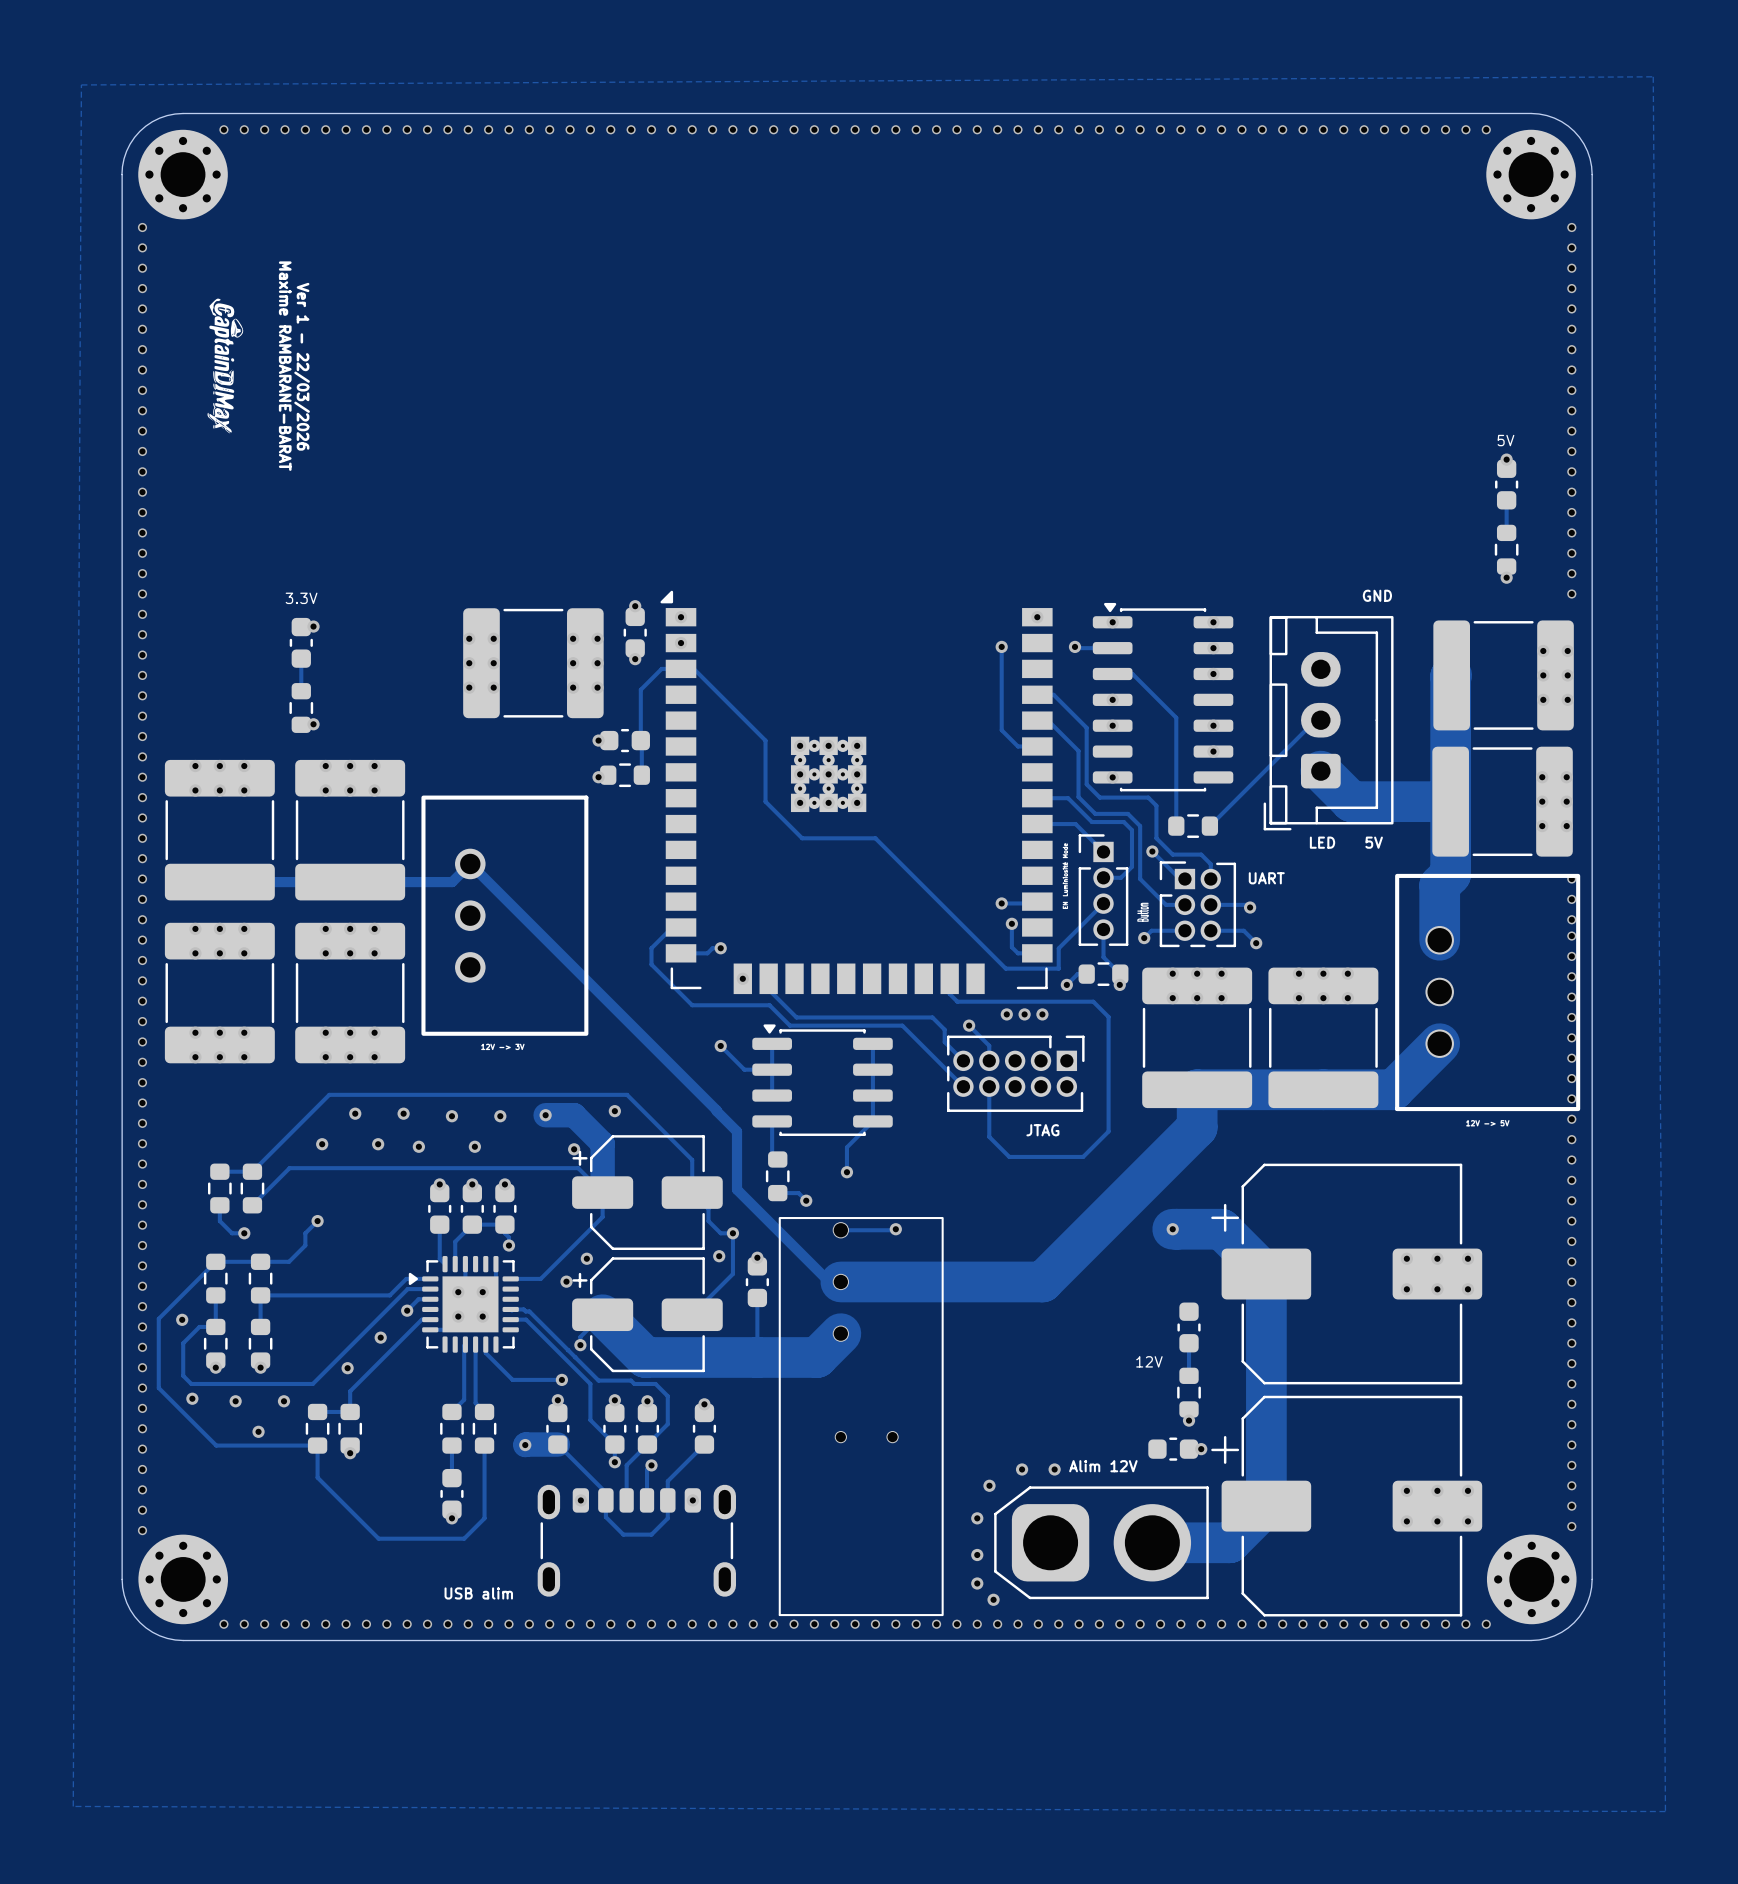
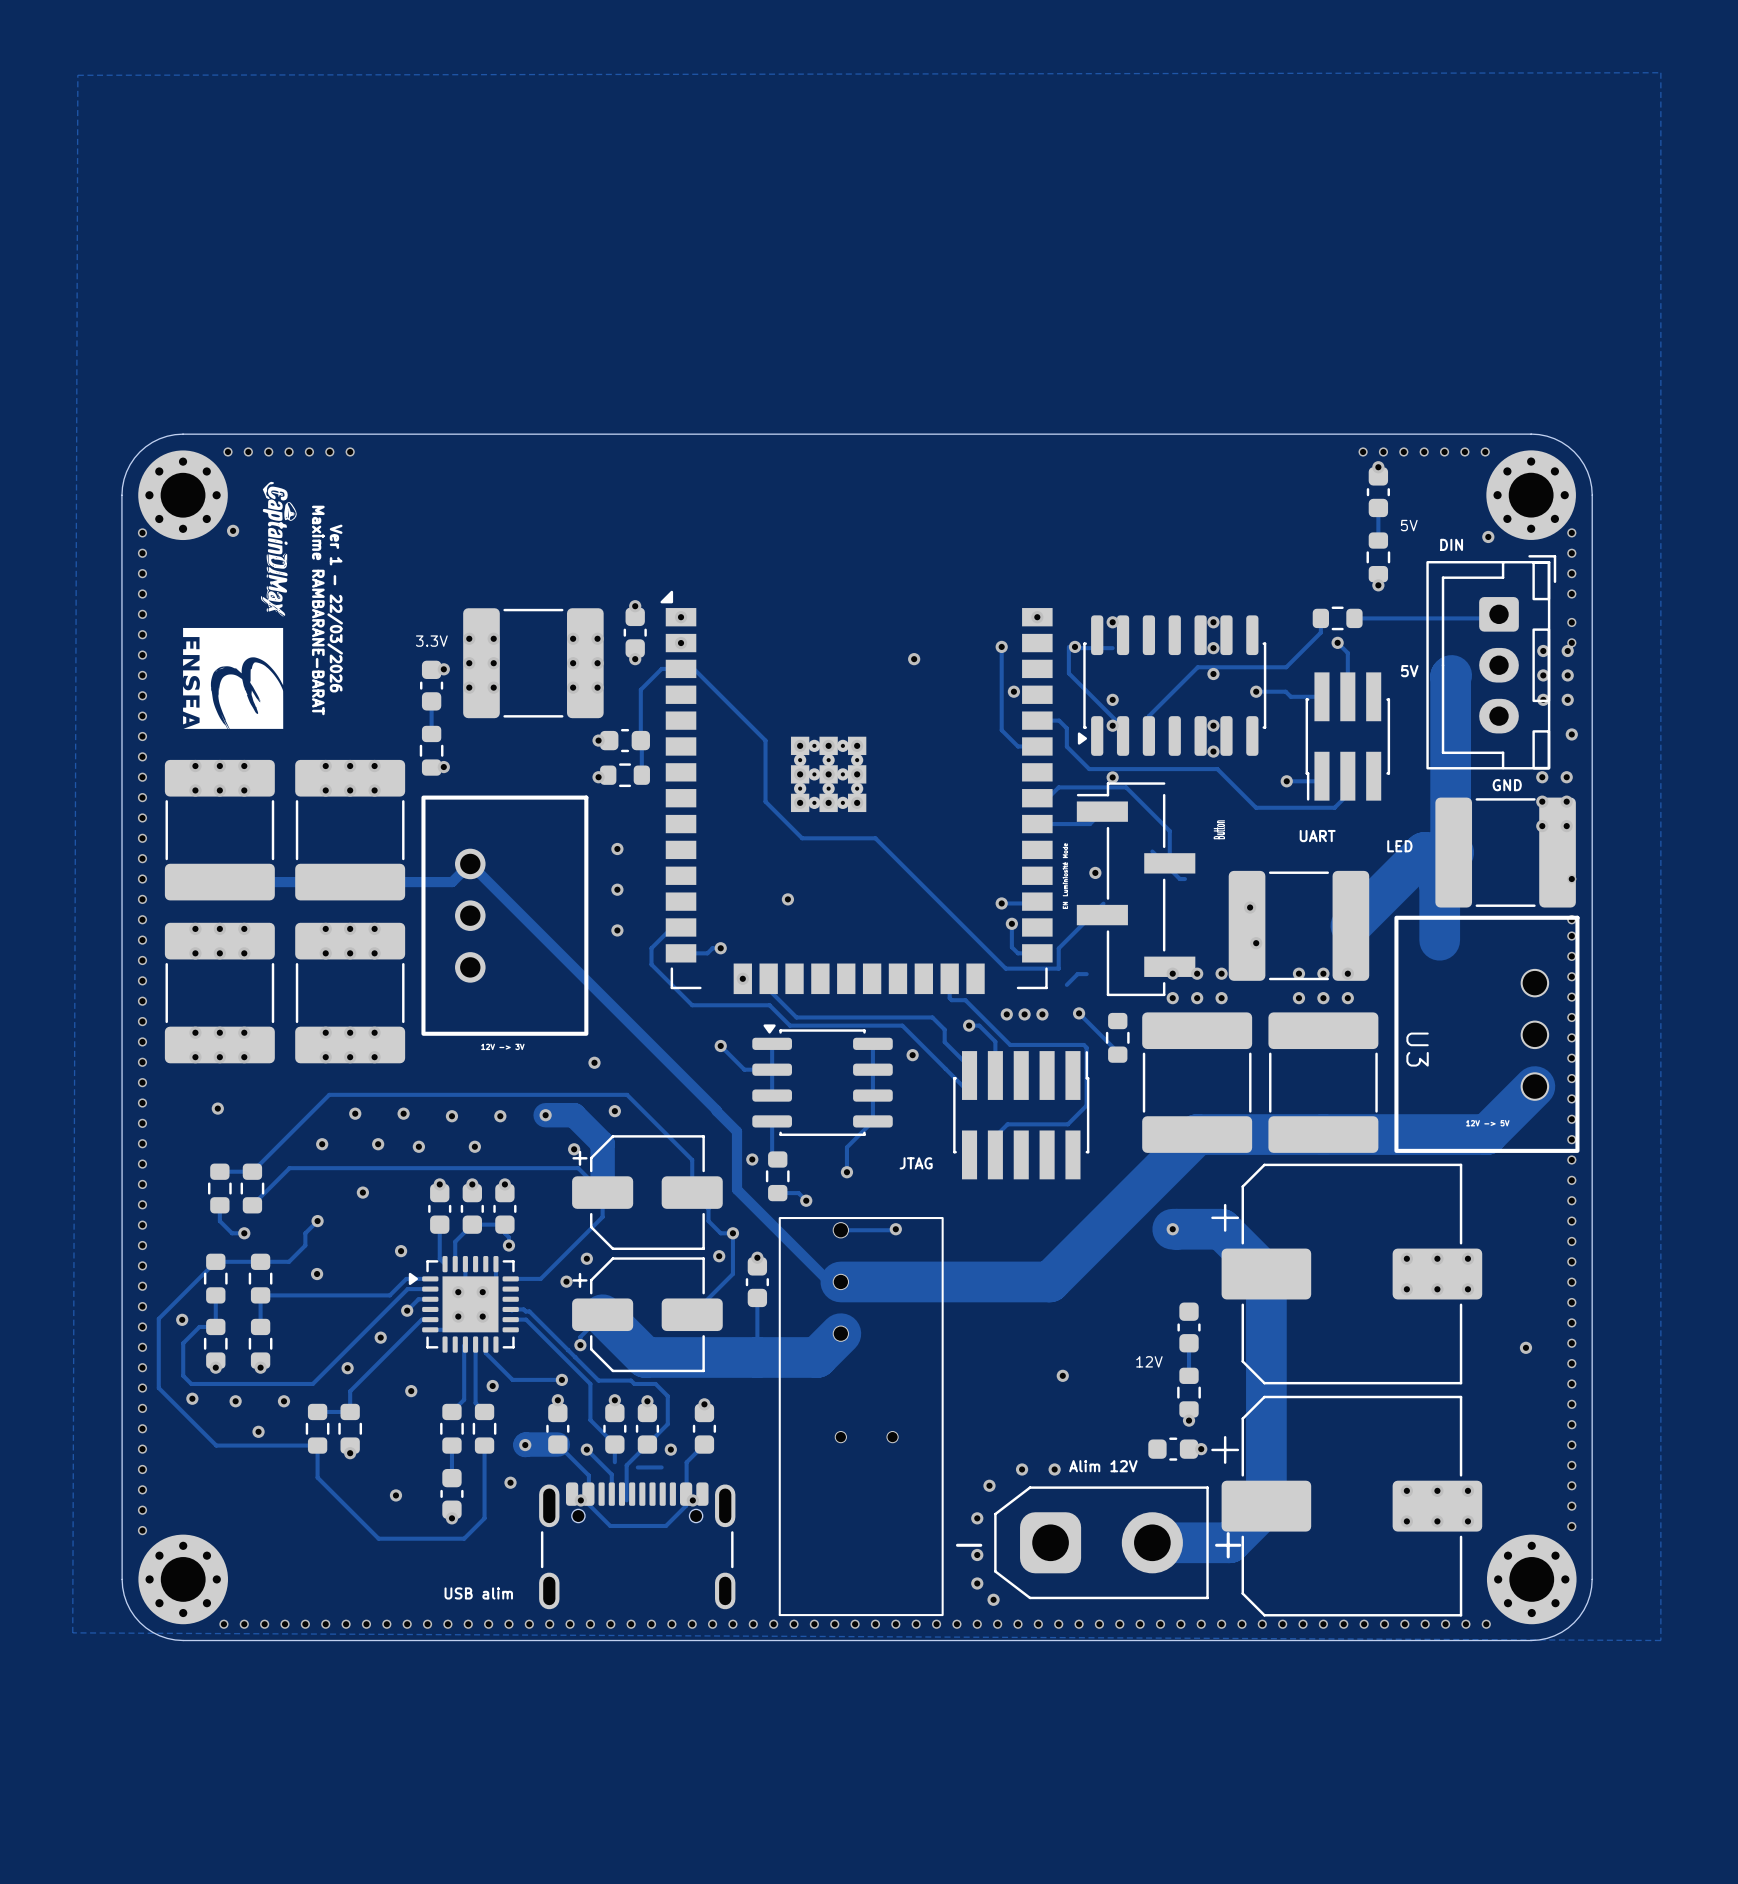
zone outline: (1653, 76) (81, 84) (73, 1806) (1665, 1811) (1653, 76) -> (1660, 72) (77, 75) (72, 1632) (1660, 1640) (1660, 72)
via: (223, 129) -> none
via: (244, 129) -> none
via: (264, 129) -> none
via: (285, 129) -> none
via: (305, 129) -> none
via: (325, 129) -> none
via: (346, 129) -> none
via: (366, 129) -> none
via: (386, 129) -> none
via: (407, 129) -> none
via: (427, 129) -> none
via: (447, 129) -> none
via: (468, 129) -> none
via: (488, 129) -> none
via: (508, 129) -> none
via: (529, 129) -> none
via: (549, 129) -> none
via: (570, 129) -> none
via: (590, 129) -> none
via: (610, 129) -> none
via: (631, 129) -> none
via: (651, 129) -> none
via: (671, 129) -> none
via: (692, 129) -> none
via: (712, 129) -> none
via: (732, 129) -> none
via: (753, 129) -> none
via: (773, 129) -> none
via: (794, 129) -> none
via: (814, 129) -> none
via: (834, 129) -> none
via: (855, 129) -> none
via: (875, 129) -> none
via: (895, 129) -> none
via: (916, 129) -> none
via: (936, 129) -> none
via: (956, 129) -> none
via: (977, 129) -> none
via: (997, 129) -> none
via: (1017, 129) -> none
via: (1038, 129) -> none
via: (1058, 129) -> none
via: (1079, 129) -> none
via: (1099, 129) -> none
via: (1119, 129) -> none
via: (1140, 129) -> none
via: (1160, 129) -> none
via: (1180, 129) -> none
via: (1201, 129) -> none
via: (1221, 129) -> none
via: (1241, 129) -> none
via: (1262, 129) -> none
via: (1282, 129) -> none
via: (1303, 129) -> none
via: (1323, 129) -> none
via: (1343, 129) -> none
via: (1364, 129) -> none
via: (1384, 129) -> none
via: (1404, 129) -> none
via: (1425, 129) -> none
via: (1445, 129) -> none
via: (1465, 129) -> none
via: (1486, 129) -> none
board edge: (121, 174) (126, 151) (139, 131) (159, 118) (183, 113) (1531, 113) (1554, 118) (1574, 131) (1587, 151) (1592, 174) (1592, 1579) -> (122, 1579) (121, 495) (126, 471) (139, 452) (159, 438) (183, 434) (1531, 434) (1546, 436) (1568, 446) (1579, 457) (1587, 471) (1592, 495) (1592, 1579)
board edge: (122, 174) (122, 1579) -> none
part position: (183, 174) -> (183, 495)
part position: (1531, 174) -> (1531, 495)
via: (142, 227) -> none
via: (1571, 227) -> none
via: (142, 247) -> none
via: (1571, 247) -> none
via: (142, 268) -> none
via: (1571, 268) -> none
via: (142, 288) -> none
via: (1571, 288) -> none
via: (142, 308) -> none
via: (1571, 308) -> none
via: (142, 329) -> none
via: (1571, 329) -> none
via: (142, 349) -> none
via: (1571, 349) -> none
drawing position: (225, 366) -> (278, 549)
text position: Maxime RAMBARANE-BARAT (285, 366) -> Maxime RAMBARANE-BARAT (318, 610)
text position: Ver 1 - 22/03/2026 (302, 366) -> Ver 1 - 22/03/2026 (335, 608)
via: (142, 370) -> none
via: (1571, 370) -> none
via: (142, 390) -> none
via: (1571, 390) -> none
via: (142, 410) -> none
via: (1571, 410) -> none
via: (142, 431) -> none
via: (1571, 431) -> none
text: 5V (1505, 440) -> none
via: (142, 451) -> none
via: none -> (228, 451)
via: none -> (248, 451)
via: none -> (268, 451)
via: none -> (289, 451)
via: none -> (309, 451)
via: none -> (329, 451)
via: none -> (350, 451)
via: none -> (1363, 451)
via: none -> (1383, 451)
via: none -> (1403, 451)
via: none -> (1424, 451)
via: none -> (1444, 451)
via: none -> (1464, 451)
via: none -> (1485, 451)
via: (1571, 451) -> none
via: (1506, 459) -> none
via: none -> (1378, 467)
via: (142, 471) -> none
via: (1571, 471) -> none
part position: (1506, 484) -> (1378, 492)
via: (142, 492) -> none
via: (1571, 492) -> none
track: (1506, 500) (1506, 532) -> (1378, 507) (1378, 540)
via: (142, 512) -> none
via: (1571, 512) -> none
text: none -> 5V (1409, 525)
via: none -> (233, 530)
via: none -> (1488, 536)
text: none -> DIN (1451, 544)
part: (1506, 549) -> none
part: none -> (1378, 557)
via: (1506, 577) -> none
via: none -> (1378, 585)
text position: GND (1377, 595) -> GND (1507, 785)
text position: 3.3V (301, 598) -> 3.3V (431, 641)
track: none -> (1499, 614) (1494, 618) (1354, 618)
track: none -> (1320, 618) (1320, 632) (1286, 667) (1197, 667) (1148, 716) (1148, 736)
part: none -> (1337, 618)
part footprint: [1433, 620, 1574, 731] -> [1426, 555, 1557, 770]
via: none -> (1571, 622)
via: (313, 626) -> none
drawing: none -> [183, 627, 284, 729]
part position: (301, 642) -> (431, 685)
track: none -> (1337, 642) (1347, 653) (1347, 696)
via: none -> (1337, 642)
via: none -> (1571, 642)
track: none -> (1068, 646) (1068, 673) (1123, 727) (1123, 736)
track: (301, 658) (301, 691) -> (431, 701) (431, 733)
via: none -> (914, 659)
via: none -> (443, 669)
text: none -> 5V (1409, 671)
track: (1112, 674) (1132, 674) (1176, 717) (1176, 826) -> none
via: none -> (1013, 691)
track: none -> (1256, 691) (1285, 691) (1290, 696) (1321, 696)
via: none -> (1256, 691)
track: (1037, 694) (1053, 694) (1086, 727) (1086, 784) (1099, 797) (1148, 797) (1156, 805) (1156, 838) (1172, 854) (1201, 854) (1210, 864) (1210, 879) -> none
part rotation: 0° (1163, 697) -> 90° counterclockwise (1172, 685)
part position: (301, 708) -> (431, 750)
track: (1048, 720) (1078, 750) (1078, 797) (1095, 813) (1127, 813) (1140, 826) (1140, 879) (1166, 904) (1184, 904) -> (1048, 720) (1059, 720) (1066, 728) (1066, 746) (1089, 769) (1217, 769) (1256, 807) (1334, 807) (1347, 794) (1347, 776)
track: (1320, 720) (1315, 720) (1209, 826) -> none
part: (1328, 723) -> none
via: (313, 724) -> none
via: none -> (1571, 734)
part: none -> (1347, 736)
via: none -> (443, 767)
track: (1320, 771) (1351, 801) (1450, 801) -> none
track: none -> (1321, 776) (1316, 781) (1286, 781)
via: none -> (1286, 781)
track: (1047, 798) (1068, 798) (1091, 822) (1123, 822) (1131, 830) (1131, 866) (1121, 877) (1103, 877) -> (1047, 798) (1058, 787) (1126, 787) (1169, 831) (1169, 863)
part position: (1502, 801) -> (1505, 852)
track: (1075, 824) (1103, 851) -> (1075, 824) (1089, 824) (1102, 811)
part: (1193, 826) -> none
text position: LED (1322, 842) -> LED (1399, 846)
text: 5V (1374, 842) -> none
via: none -> (617, 849)
via: (1152, 851) -> none
track: none -> (1453, 852) (1424, 852) (1350, 925)
via: none -> (1095, 872)
text position: UART (1266, 878) -> UART (1317, 836)
via: none -> (617, 889)
part: none -> (1136, 889)
part: (1103, 890) -> none
via: none -> (787, 899)
via: (1571, 899) -> none
part: (1197, 904) -> none
track: (1210, 904) (1247, 904) (1250, 907) -> none
text position: Button (1142, 912) -> Button (1219, 829)
part: none -> (1298, 925)
track: (1103, 929) (1103, 957) (1120, 974) -> none
via: none -> (617, 930)
track: (1184, 930) (1151, 930) (1144, 938) -> none
track: (1210, 930) (1243, 930) (1256, 943) -> none
via: (1144, 938) -> none
part rotation: 0° (1103, 974) -> 90° clockwise (1117, 1037)
part position: (1103, 974) -> (1117, 1037)
via: (1066, 984) -> none
via: (1119, 984) -> none
part: (1487, 992) -> none
track: (949, 993) (957, 1001) (1093, 1001) (1108, 1016) (1108, 1131) (1083, 1156) (1009, 1156) (989, 1136) (989, 1086) -> (949, 993) (951, 1000) (965, 1000) (1010, 1044) (1083, 1044) (1086, 1047) (1086, 1105) (1067, 1124) (1007, 1124) (995, 1136) (995, 1171)
track: none -> (1079, 1013) (1117, 1052) (1117, 1054)
via: none -> (1079, 1013)
track: (969, 1025) (989, 1045) (989, 1060) -> (969, 1025) (979, 1025) (995, 1041) (995, 1075)
U3: none -> (1486, 1034)
part position: (1197, 1037) -> (1197, 1082)
part position: (1323, 1037) -> (1323, 1082)
track: (1439, 1043) (1393, 1089) (1197, 1089) (1197, 1127) (1042, 1281) -> (1534, 1086) (1486, 1134) (1197, 1134) (1049, 1281) (1042, 1281)
via: none -> (912, 1055)
via: none -> (594, 1062)
part: (1015, 1073) -> none
via: none -> (217, 1108)
part: none -> (1021, 1115)
text position: JTAG (1042, 1130) -> JTAG (916, 1163)
via: none -> (752, 1159)
via: none -> (362, 1192)
via: none -> (401, 1251)
via: none -> (317, 1274)
via: none -> (1525, 1347)
via: none -> (1062, 1375)
via: none -> (492, 1386)
via: none -> (411, 1391)
track: none -> (586, 1449) (611, 1474) (611, 1494)
via: none -> (586, 1449)
via: (614, 1462) -> none
track: (686, 1462) (667, 1481) (667, 1518) (651, 1534) (623, 1534) (605, 1517) (605, 1492) (588, 1475) -> (686, 1494) (686, 1505) (665, 1525) (610, 1525) (588, 1504) (588, 1475)
track: none -> (686, 1462) (686, 1502)
track: (651, 1465) (647, 1469) (647, 1500) -> none
via position: (651, 1465) -> (670, 1449)
track: none -> (637, 1467) (661, 1467)
via: none -> (510, 1482)
part footprint: [537, 1484, 737, 1597] -> [539, 1482, 736, 1610]
part footprint: [994, 1486, 1209, 1600] -> [994, 1486, 1209, 1600]
via: none -> (395, 1495)

